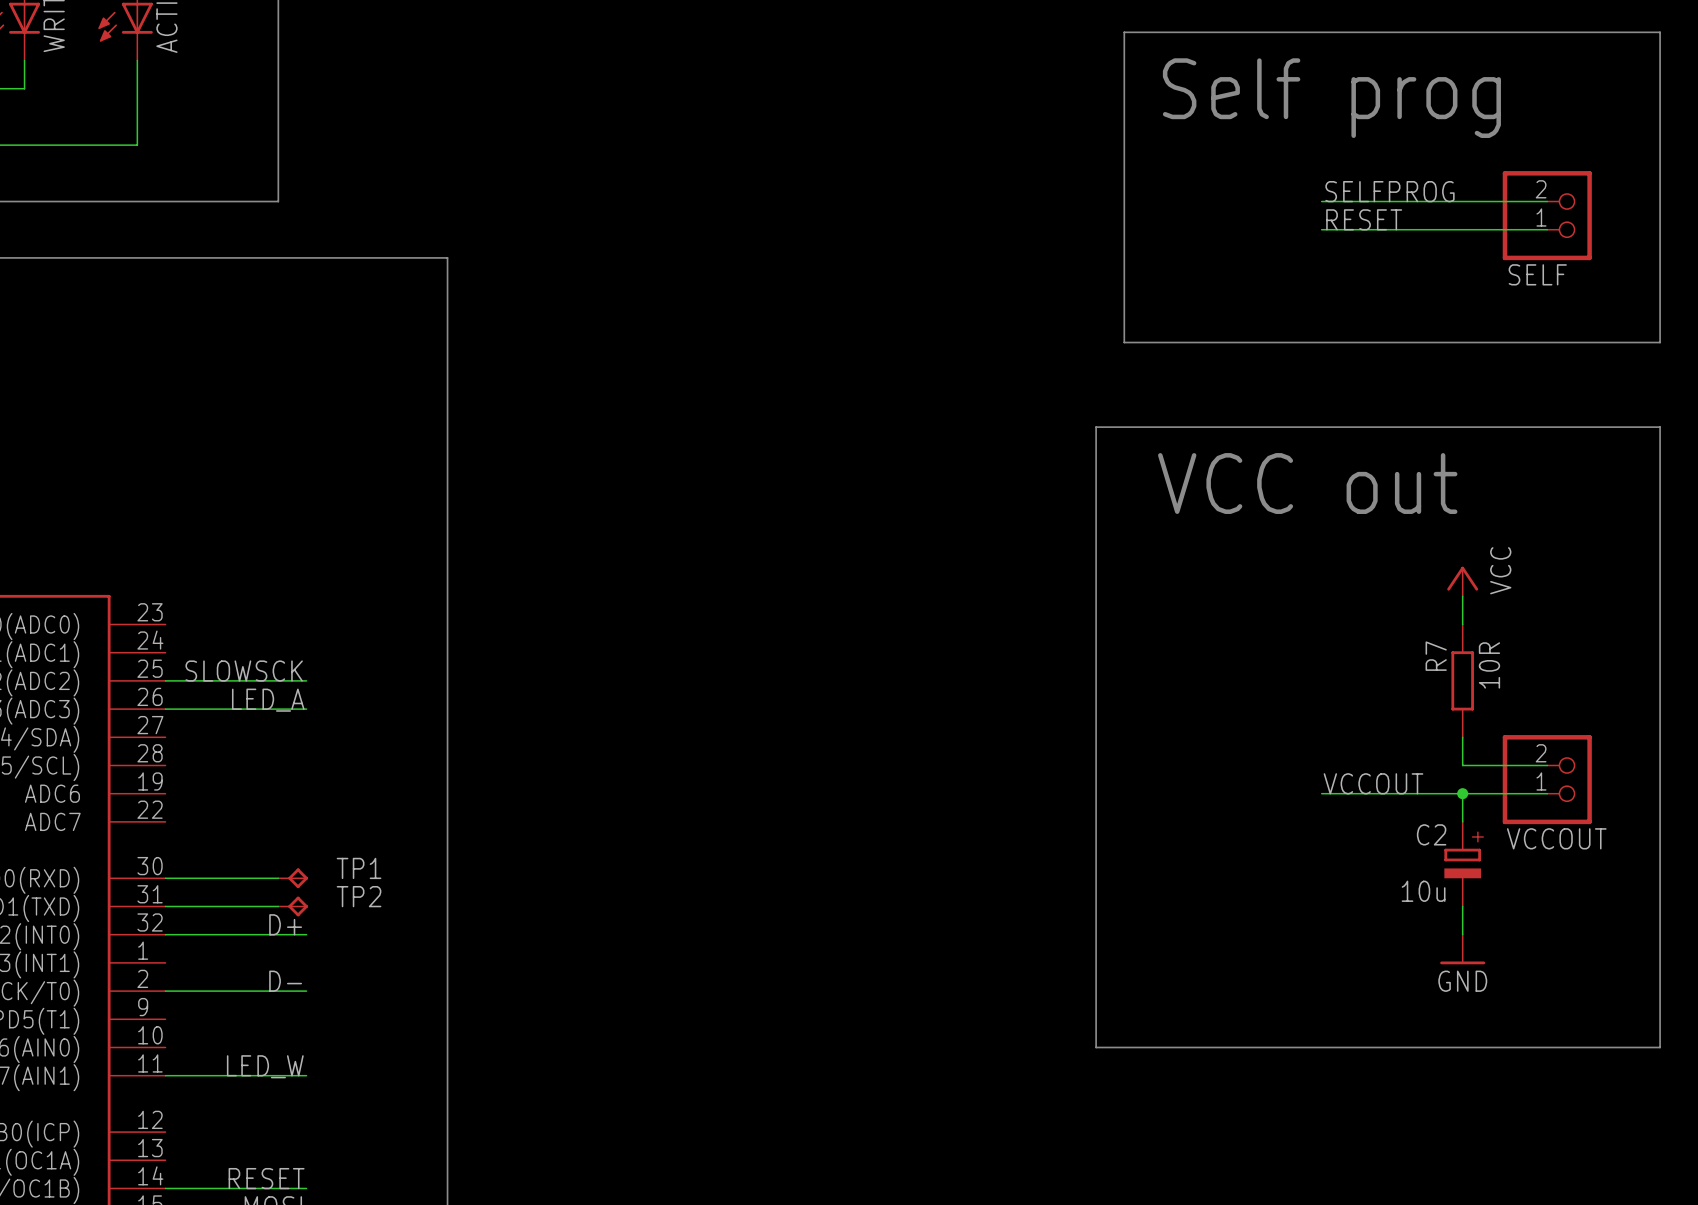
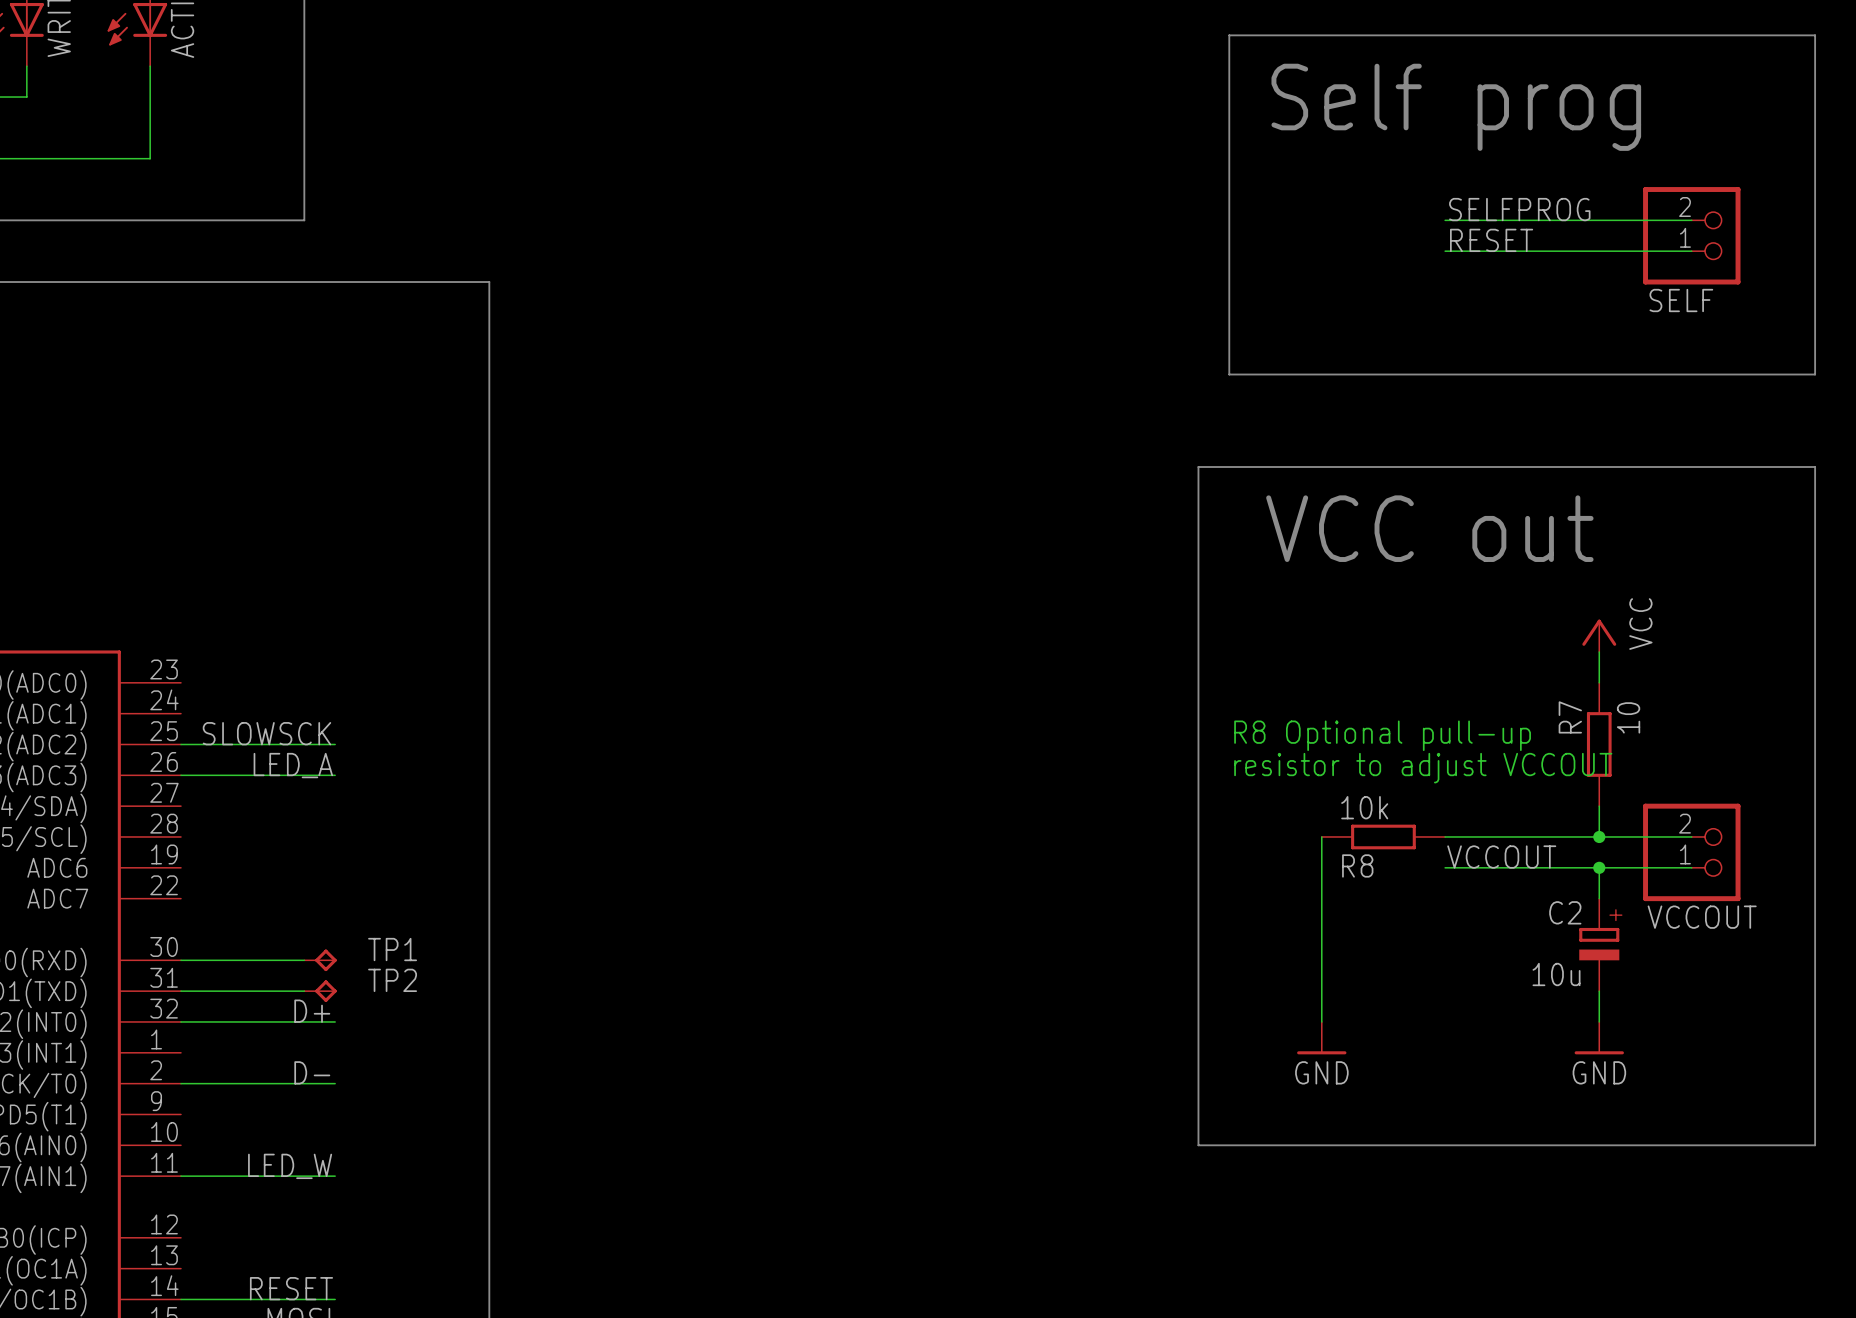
R7 value: 10R (1489, 665) -> 10 (1628, 717)
text: none -> R8 Optional pull-up (1382, 735)
text: none -> resistor to adjust VCCOUT (1423, 768)
wire: none -> (1321, 836) (1321, 1021)
R8: none -> 10k (1383, 836)
wire: none -> (1445, 836) (1599, 836)
junction: none -> (1599, 836)
power symbol: none -> GND (1321, 1038)

